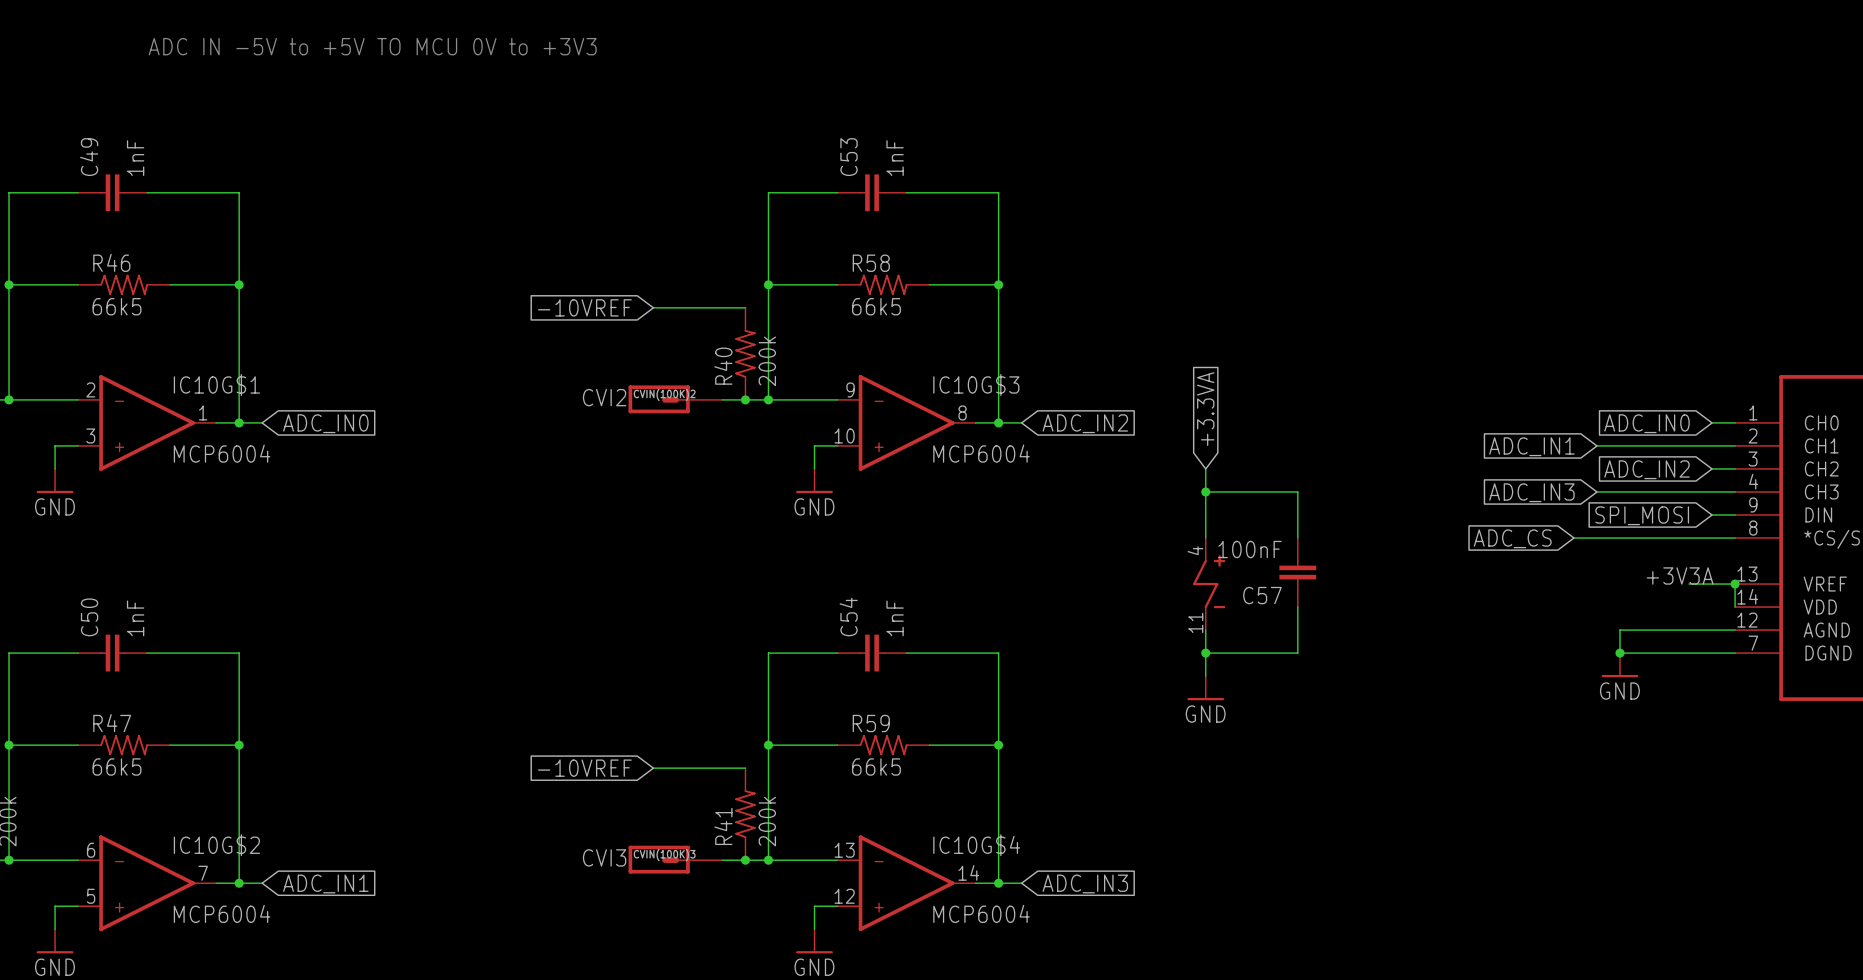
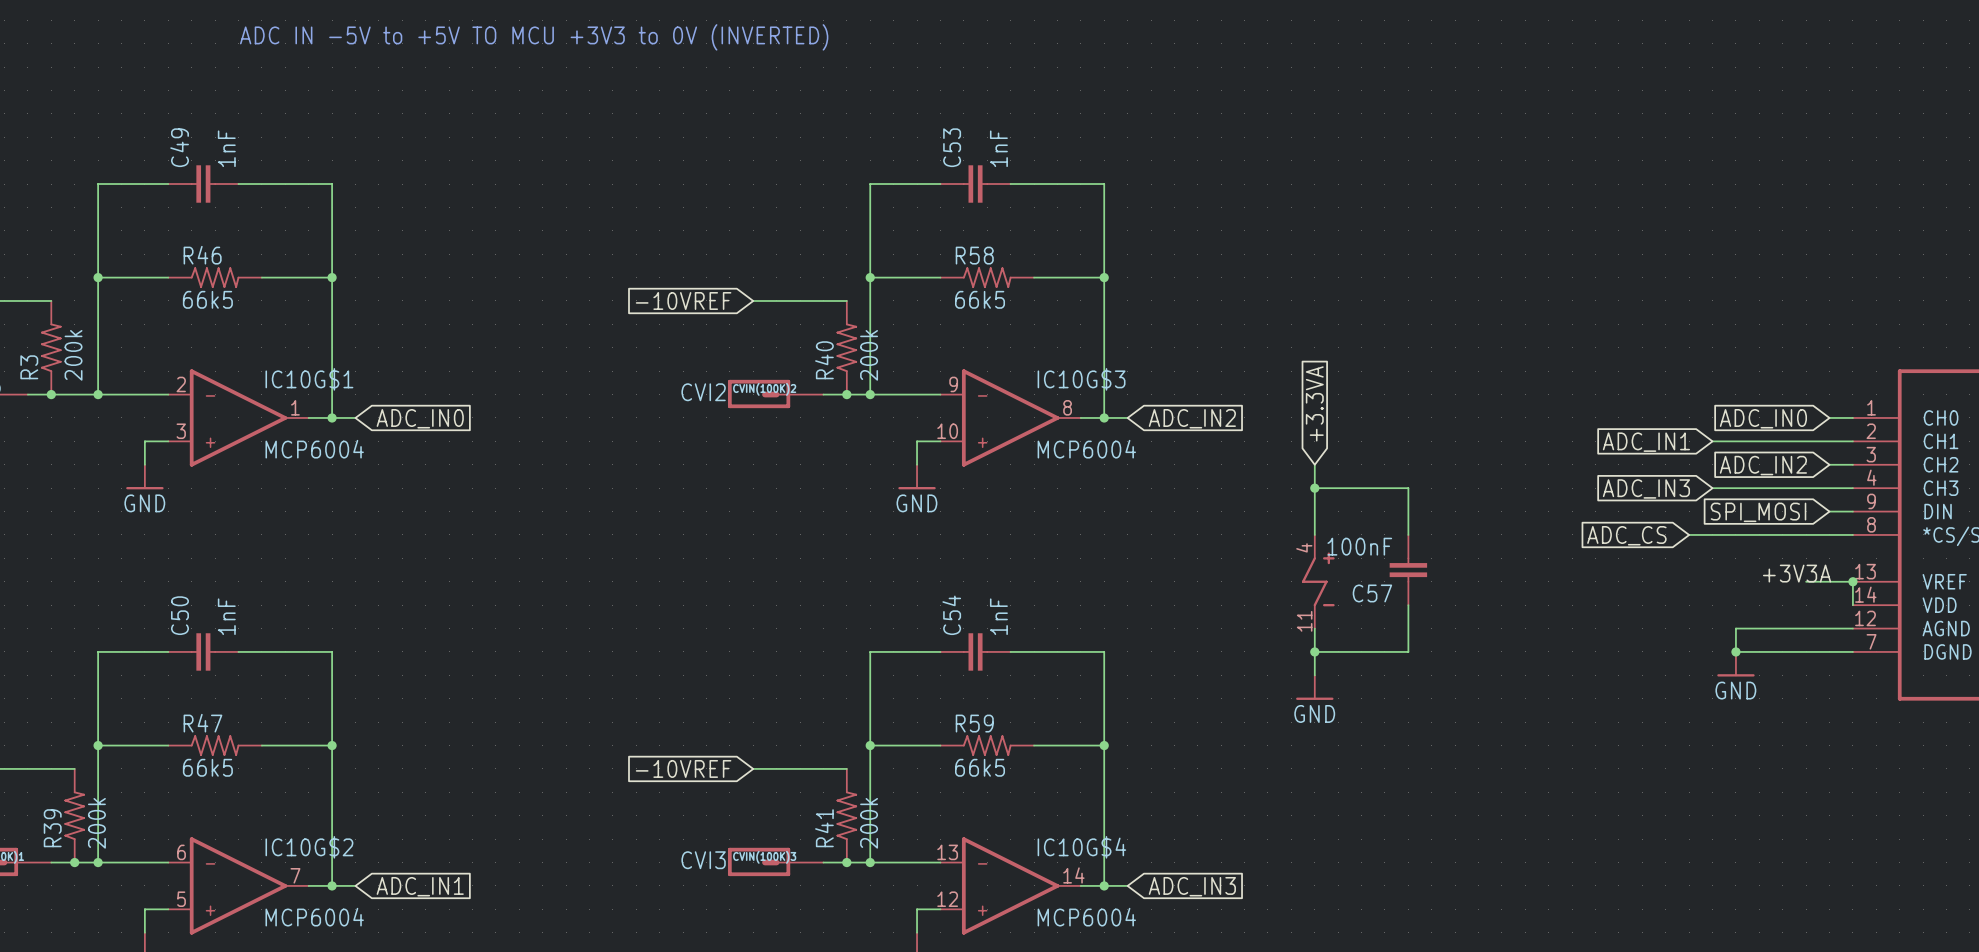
text: ADC IN -5V to +5V TO MCU 0V to +3V3 (372, 46) -> ADC IN -5V to +5V TO MCU +3V3 to 0V (INVERTED) (534, 37)

